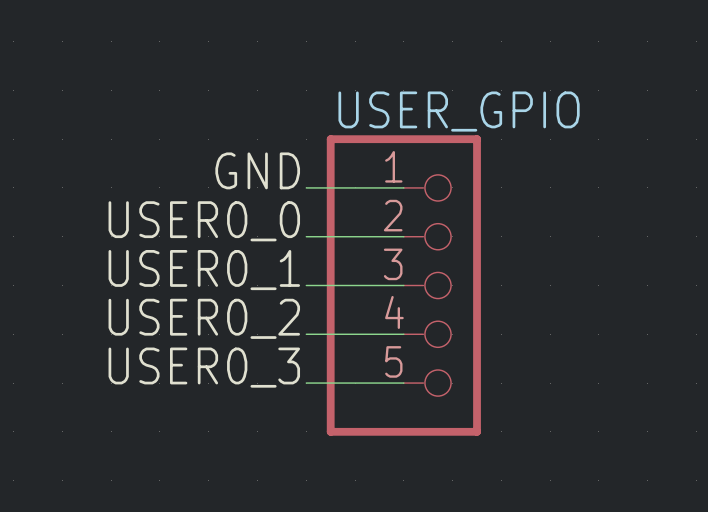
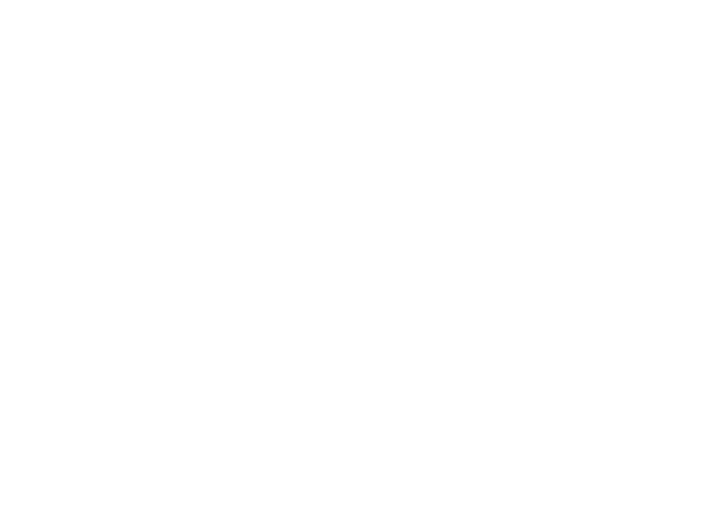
label: GND (257, 170) -> none
wire: (306, 187) (403, 187) -> none
label: USER0_0 (204, 221) -> none
wire: (306, 236) (403, 236) -> none
label: USER0_1 (204, 270) -> none
wire: (306, 285) (403, 285) -> none
USER_GPIO: (403, 285) -> none
label: USER0_2 (204, 318) -> none
wire: (306, 334) (403, 334) -> none
label: USER0_3 (204, 367) -> none
wire: (306, 383) (403, 383) -> none

